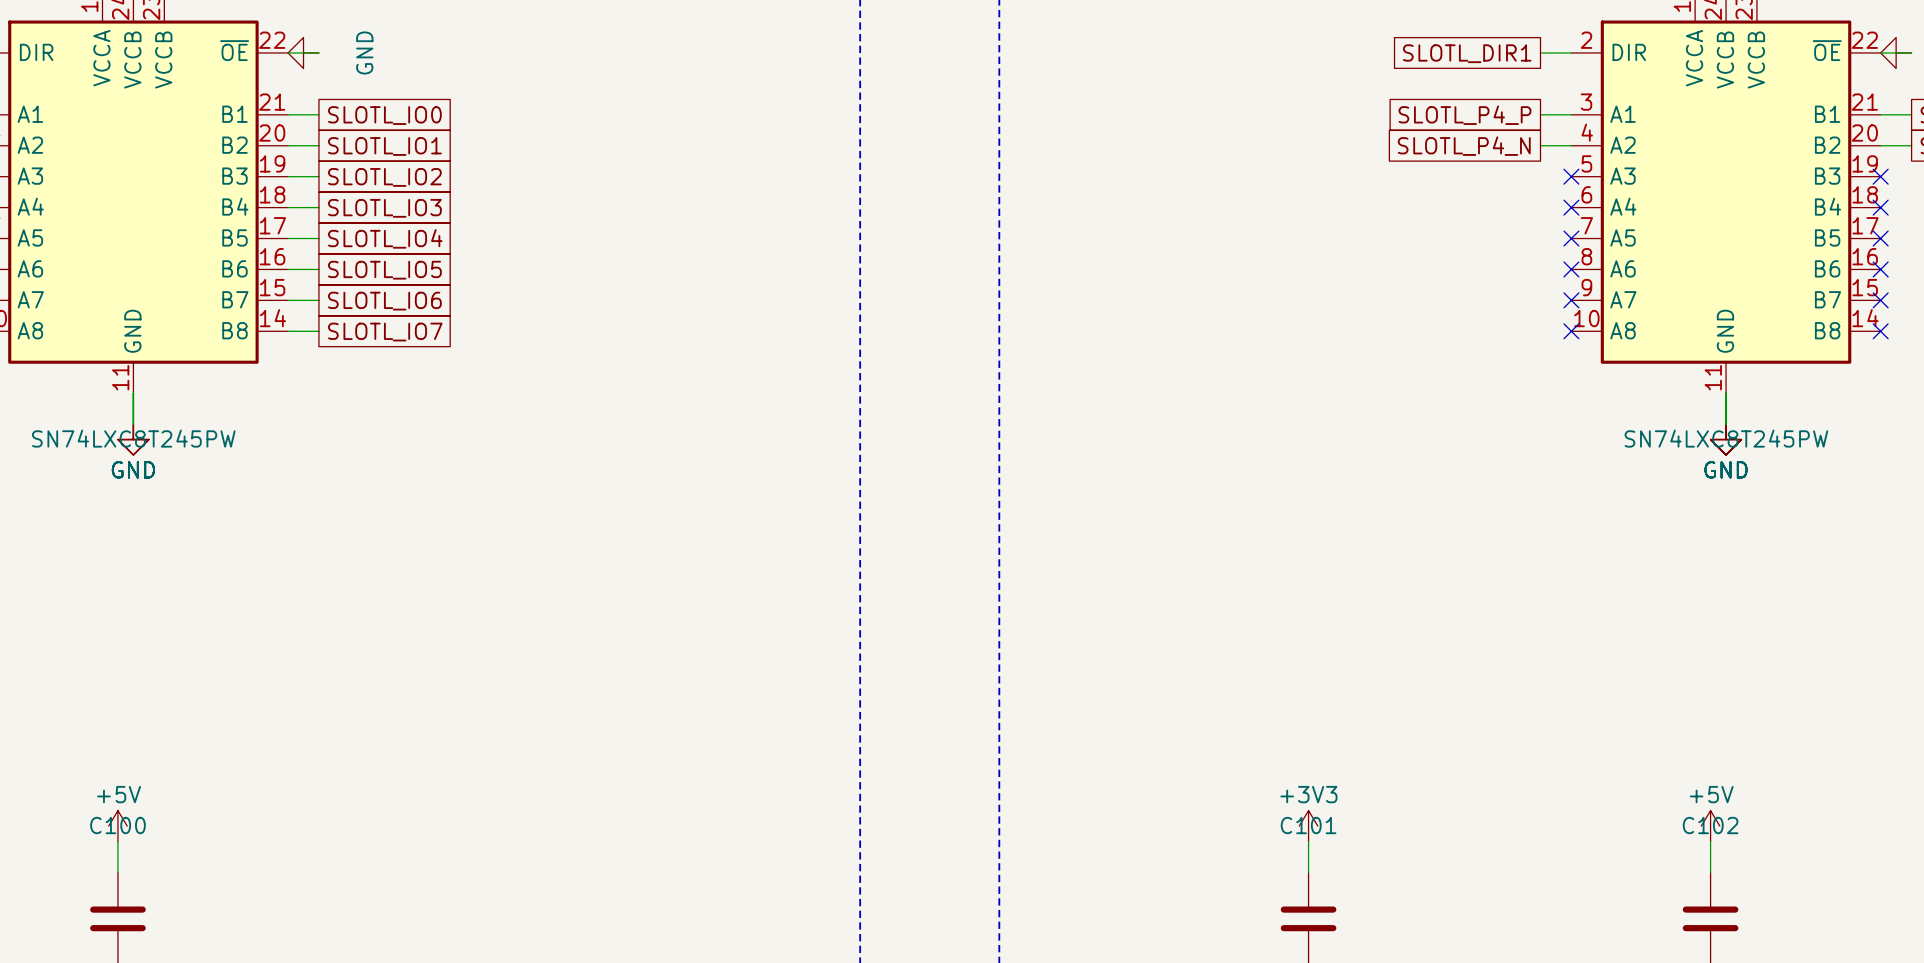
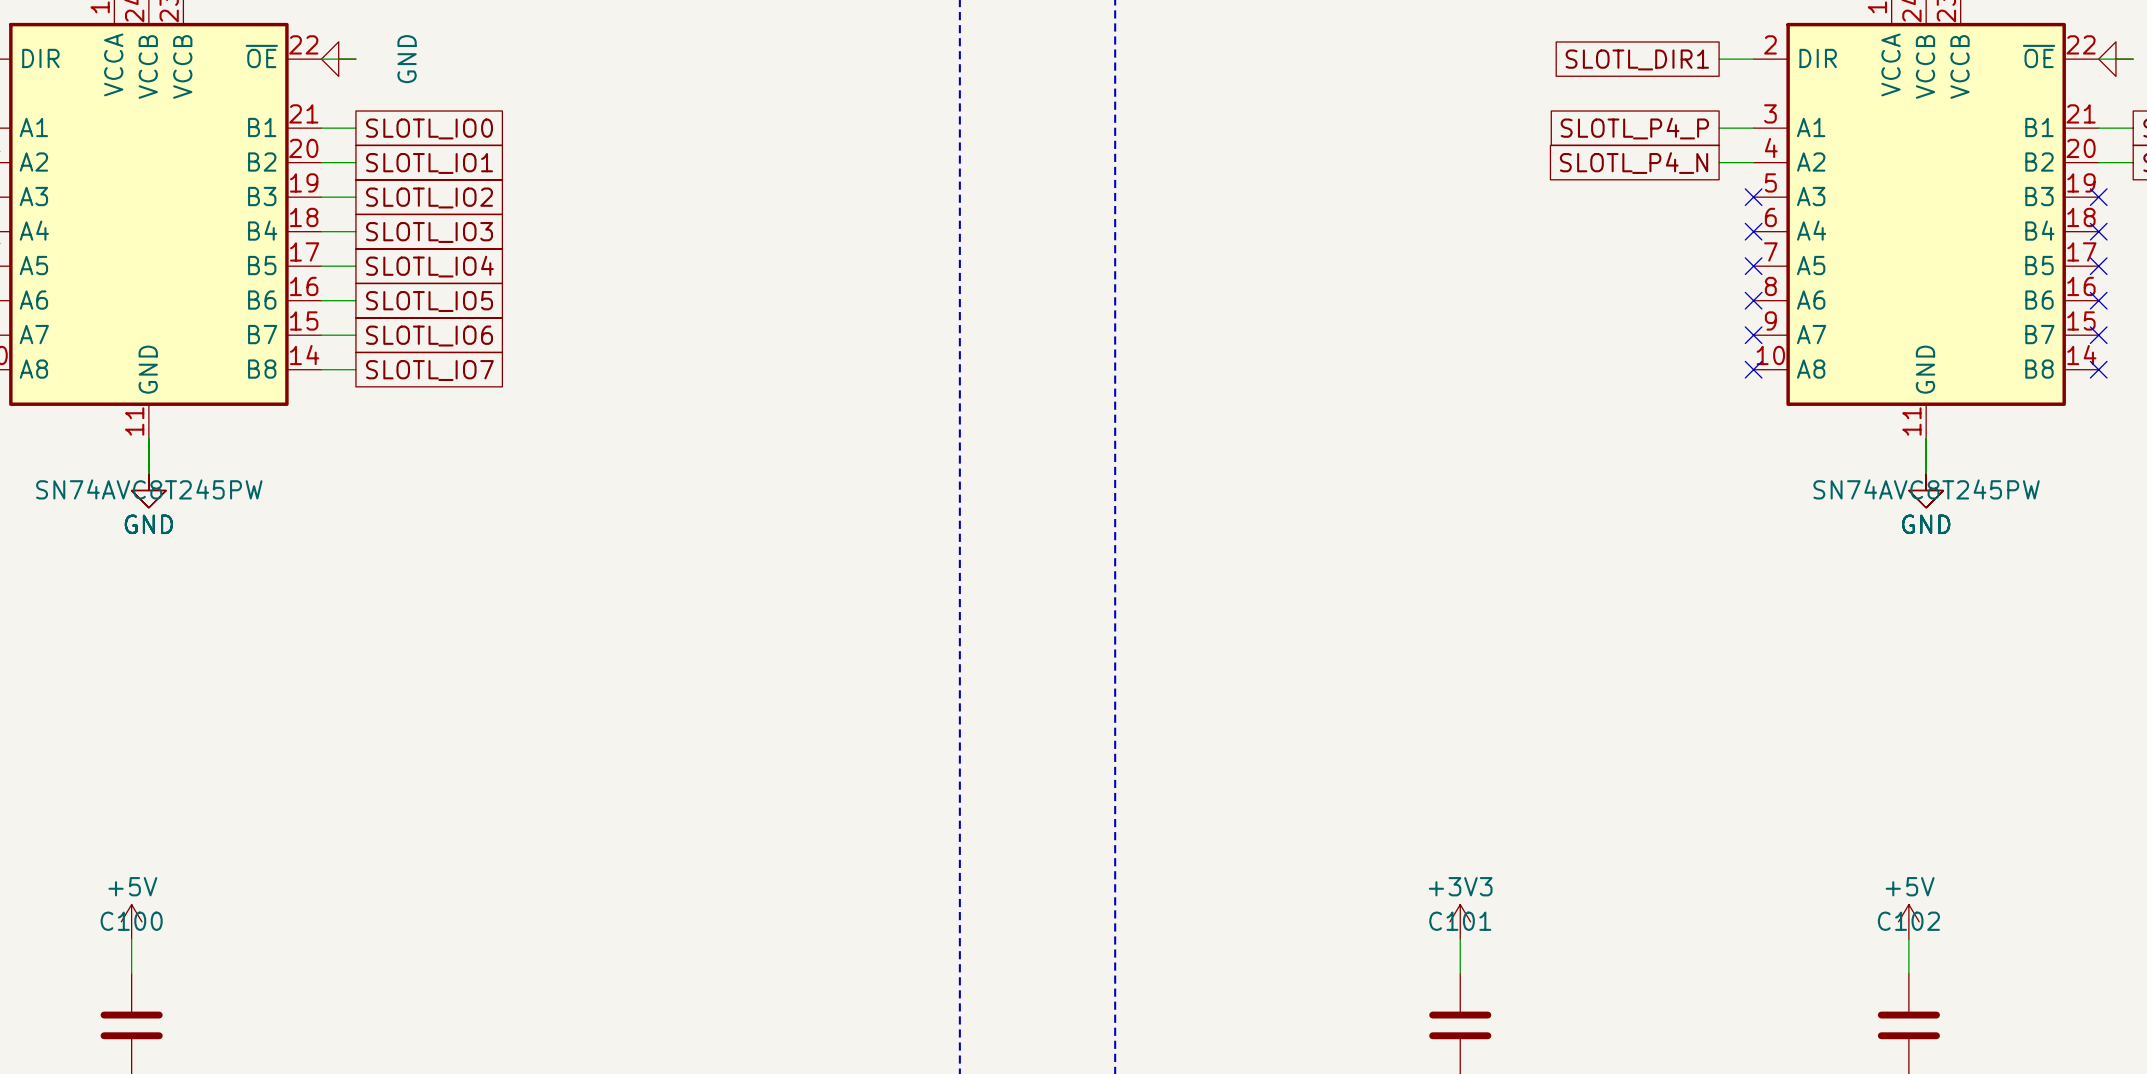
part value: SN74LXC8T245PW (133, 438) -> SN74AVC8T245PW (149, 489)
part value: SN74LXC8T245PW (1726, 438) -> SN74AVC8T245PW (1926, 489)

